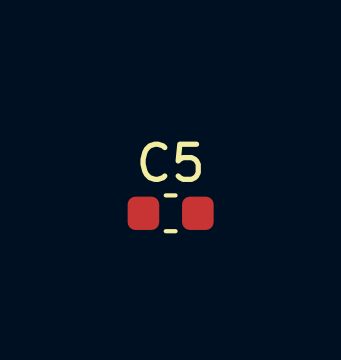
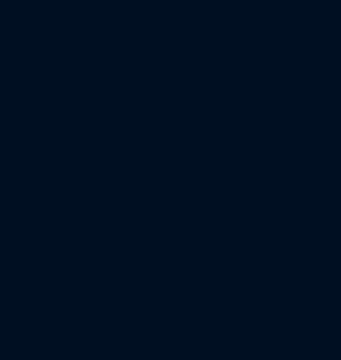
C5: (170, 213) -> none

